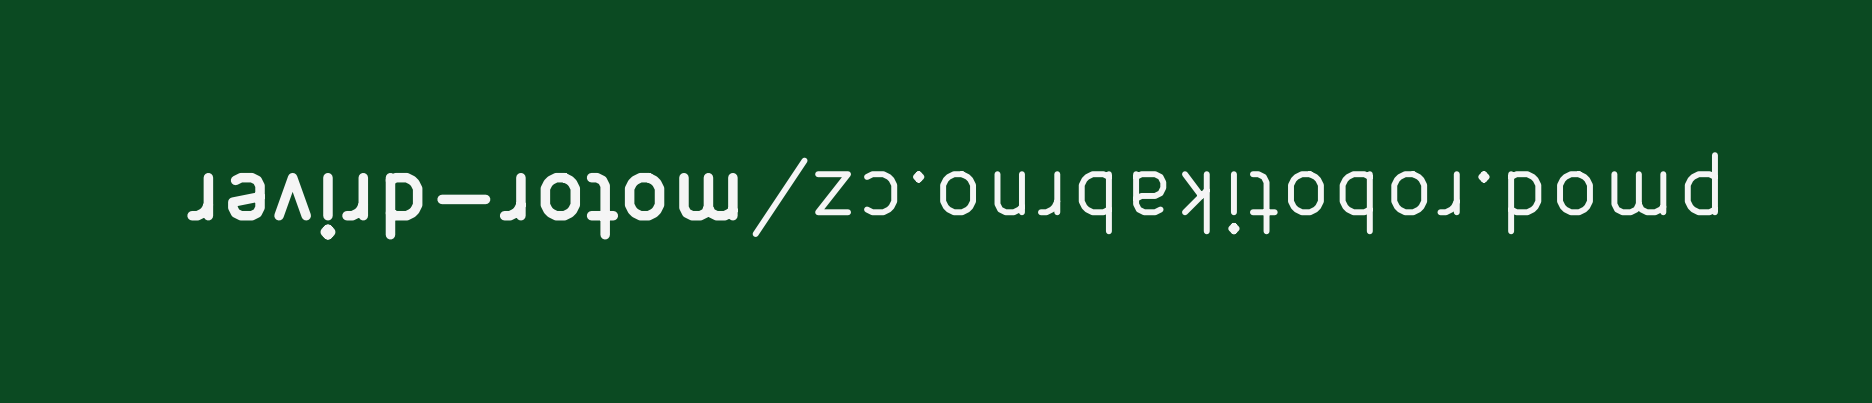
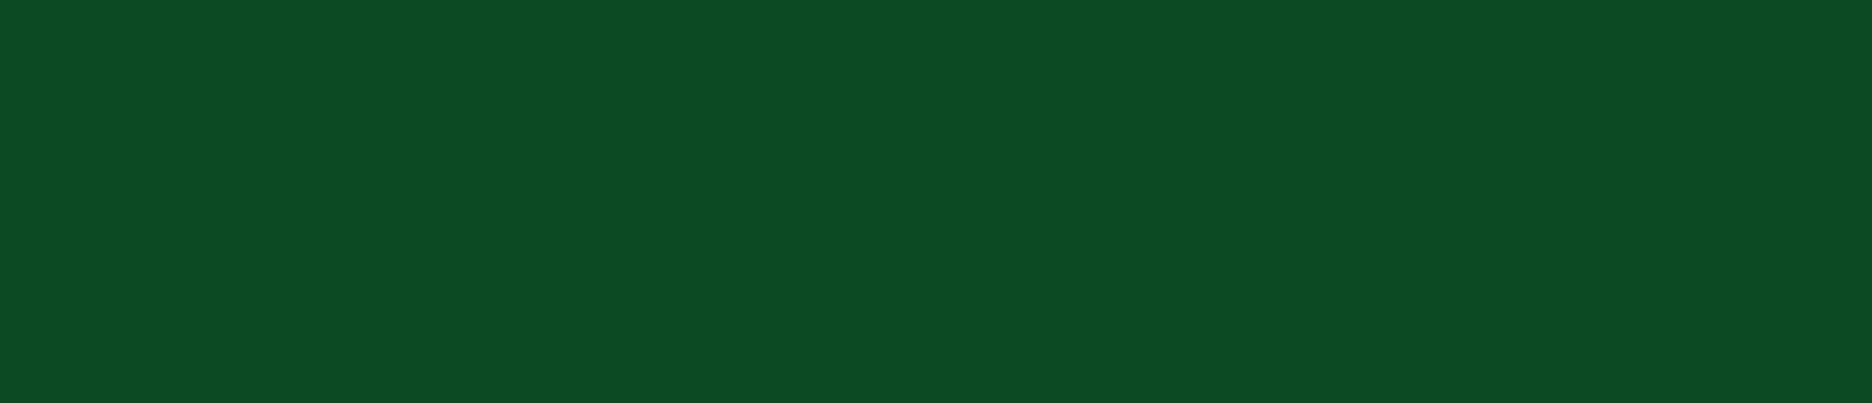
text: pmod.robotikabrno.cz/ (1235, 194) -> none
text: motor-driver (462, 206) -> none

